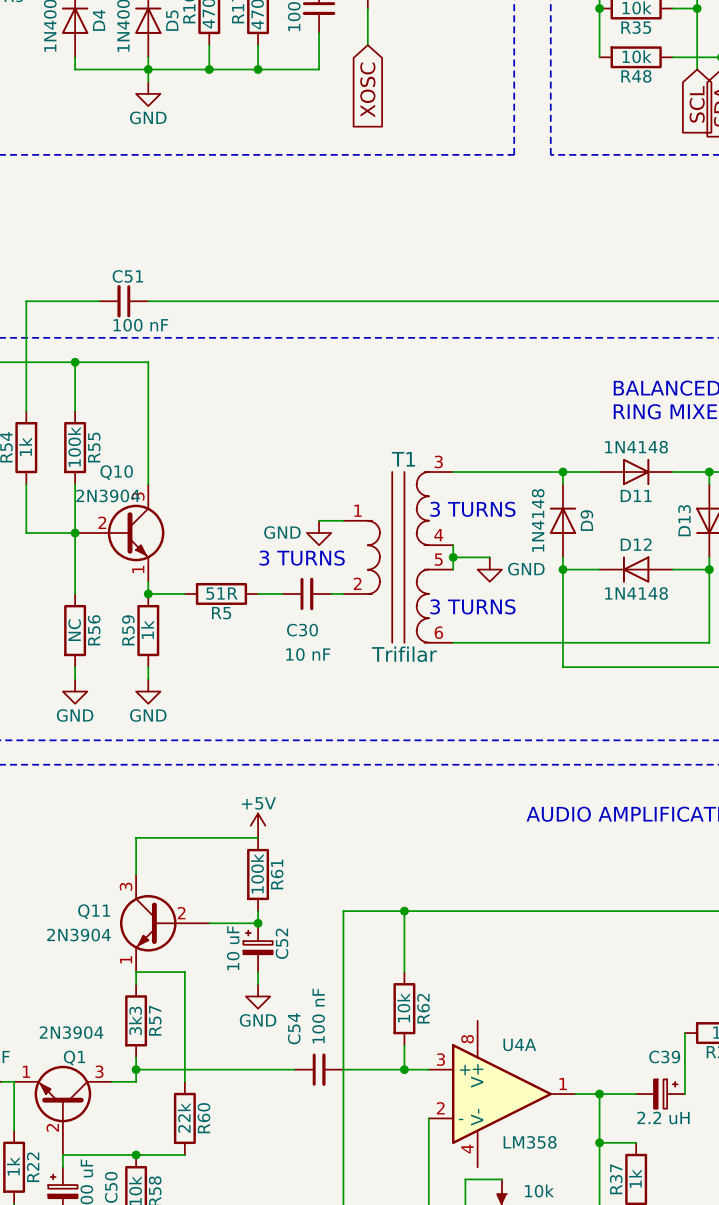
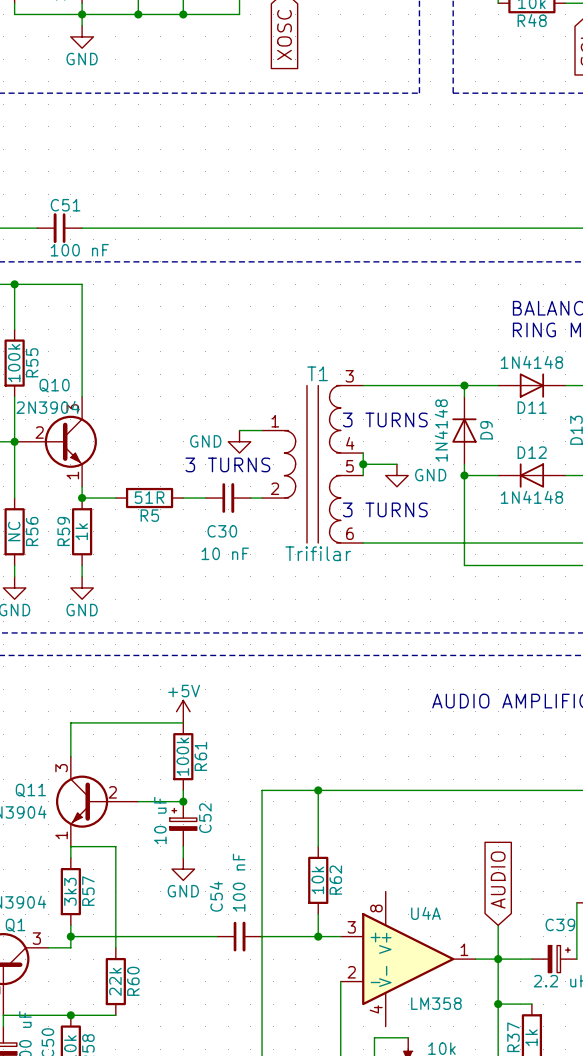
global label: none -> AUDIO (498, 880)
wire: none -> (498, 925) (498, 959)

